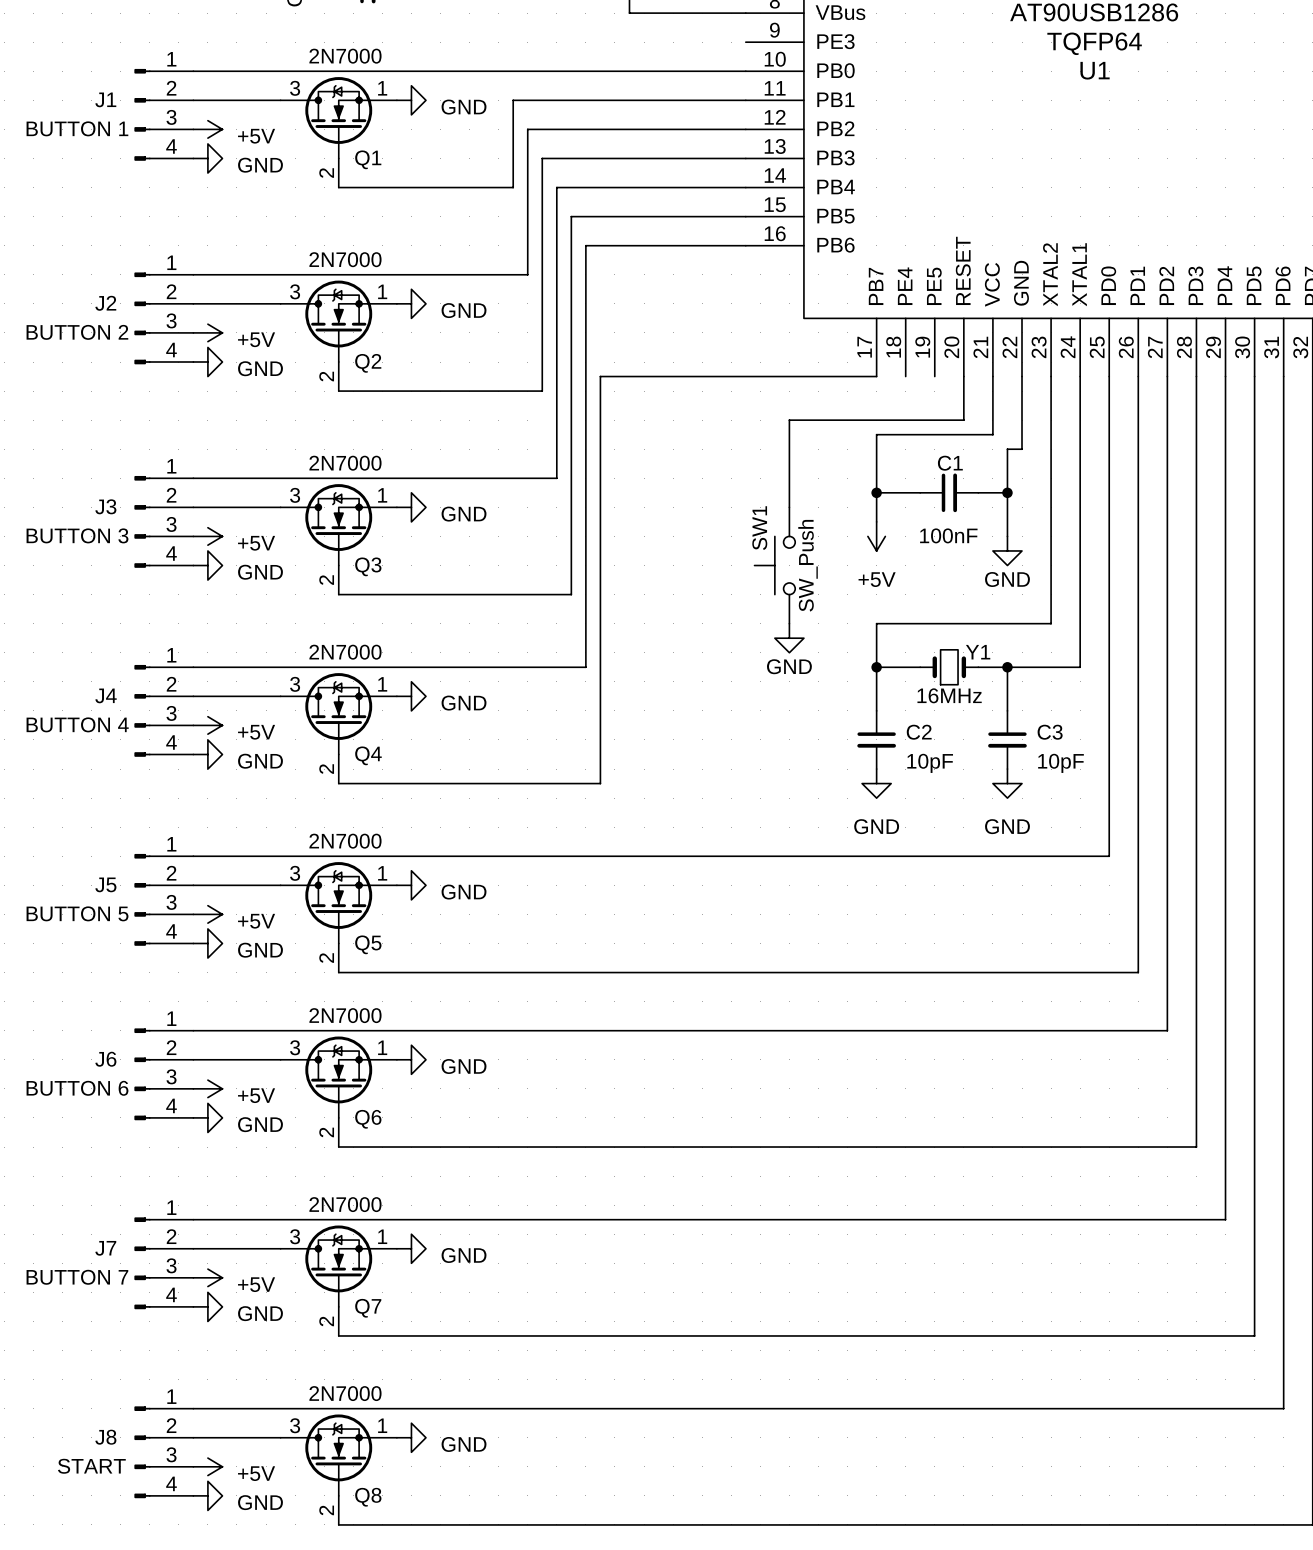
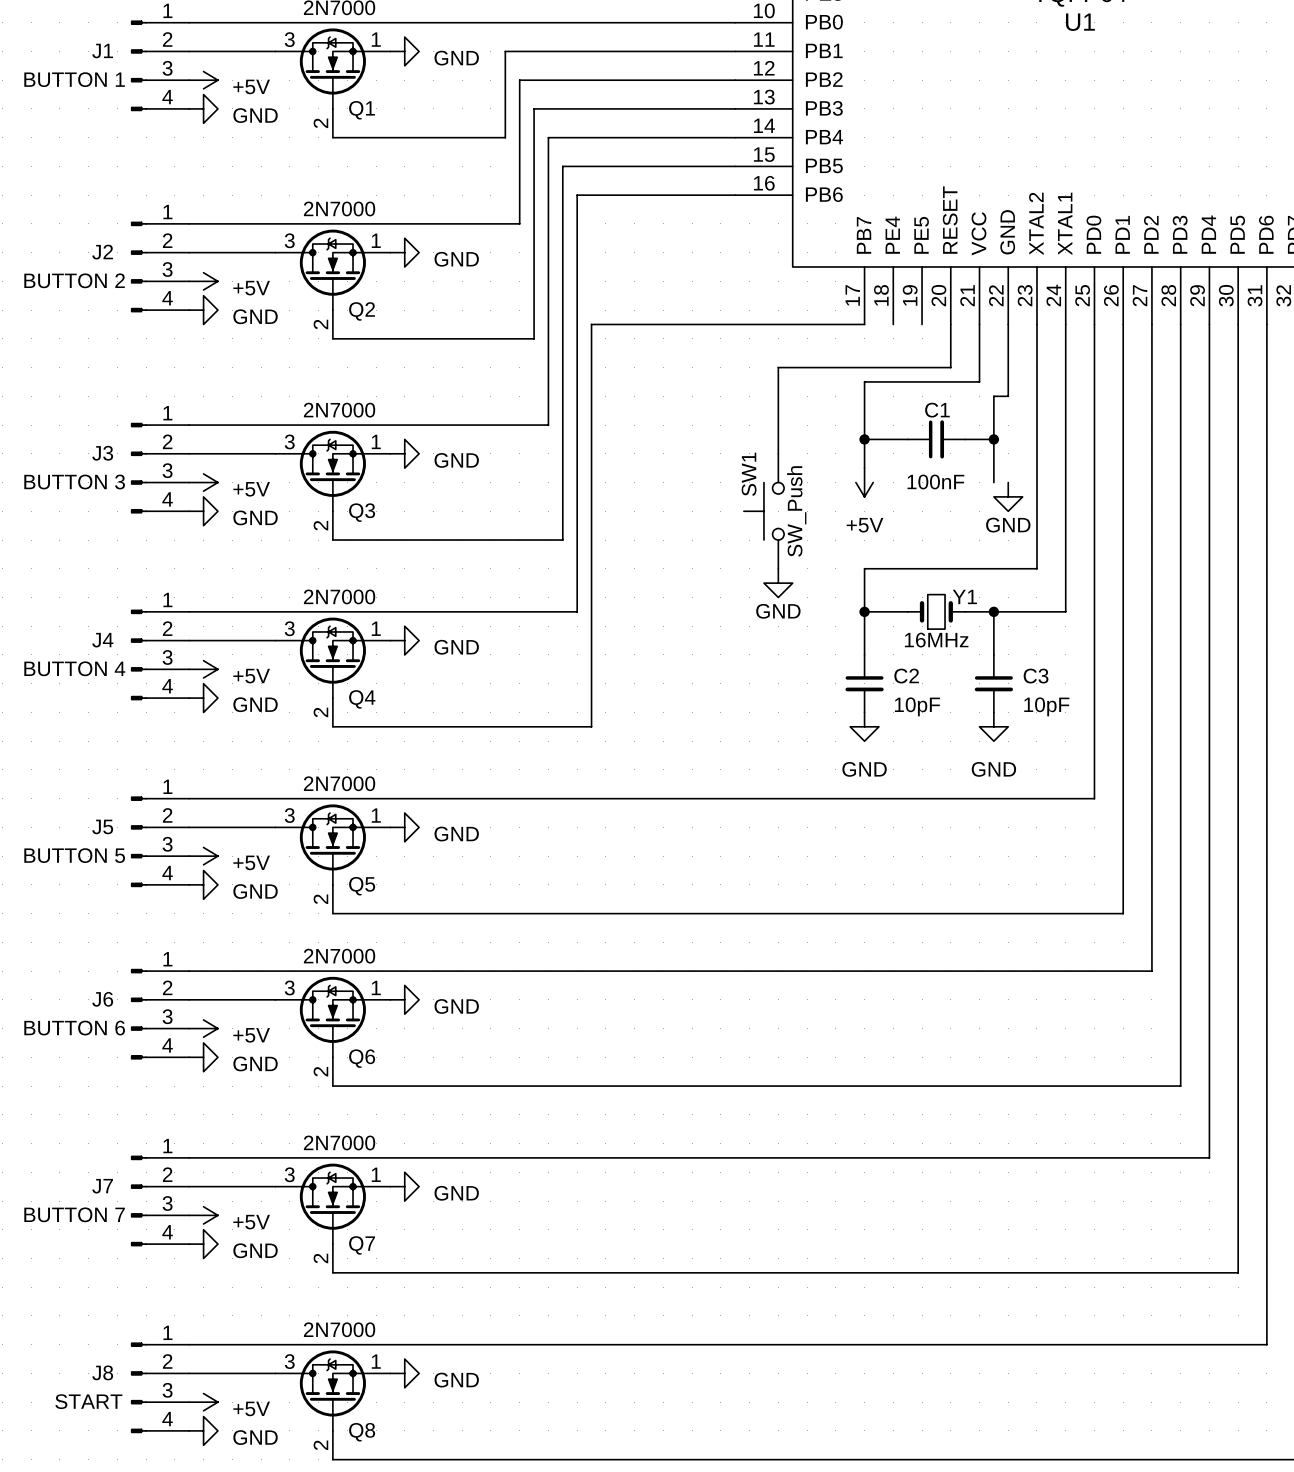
power symbol position: GND (1007, 550) -> GND (1008, 496)

